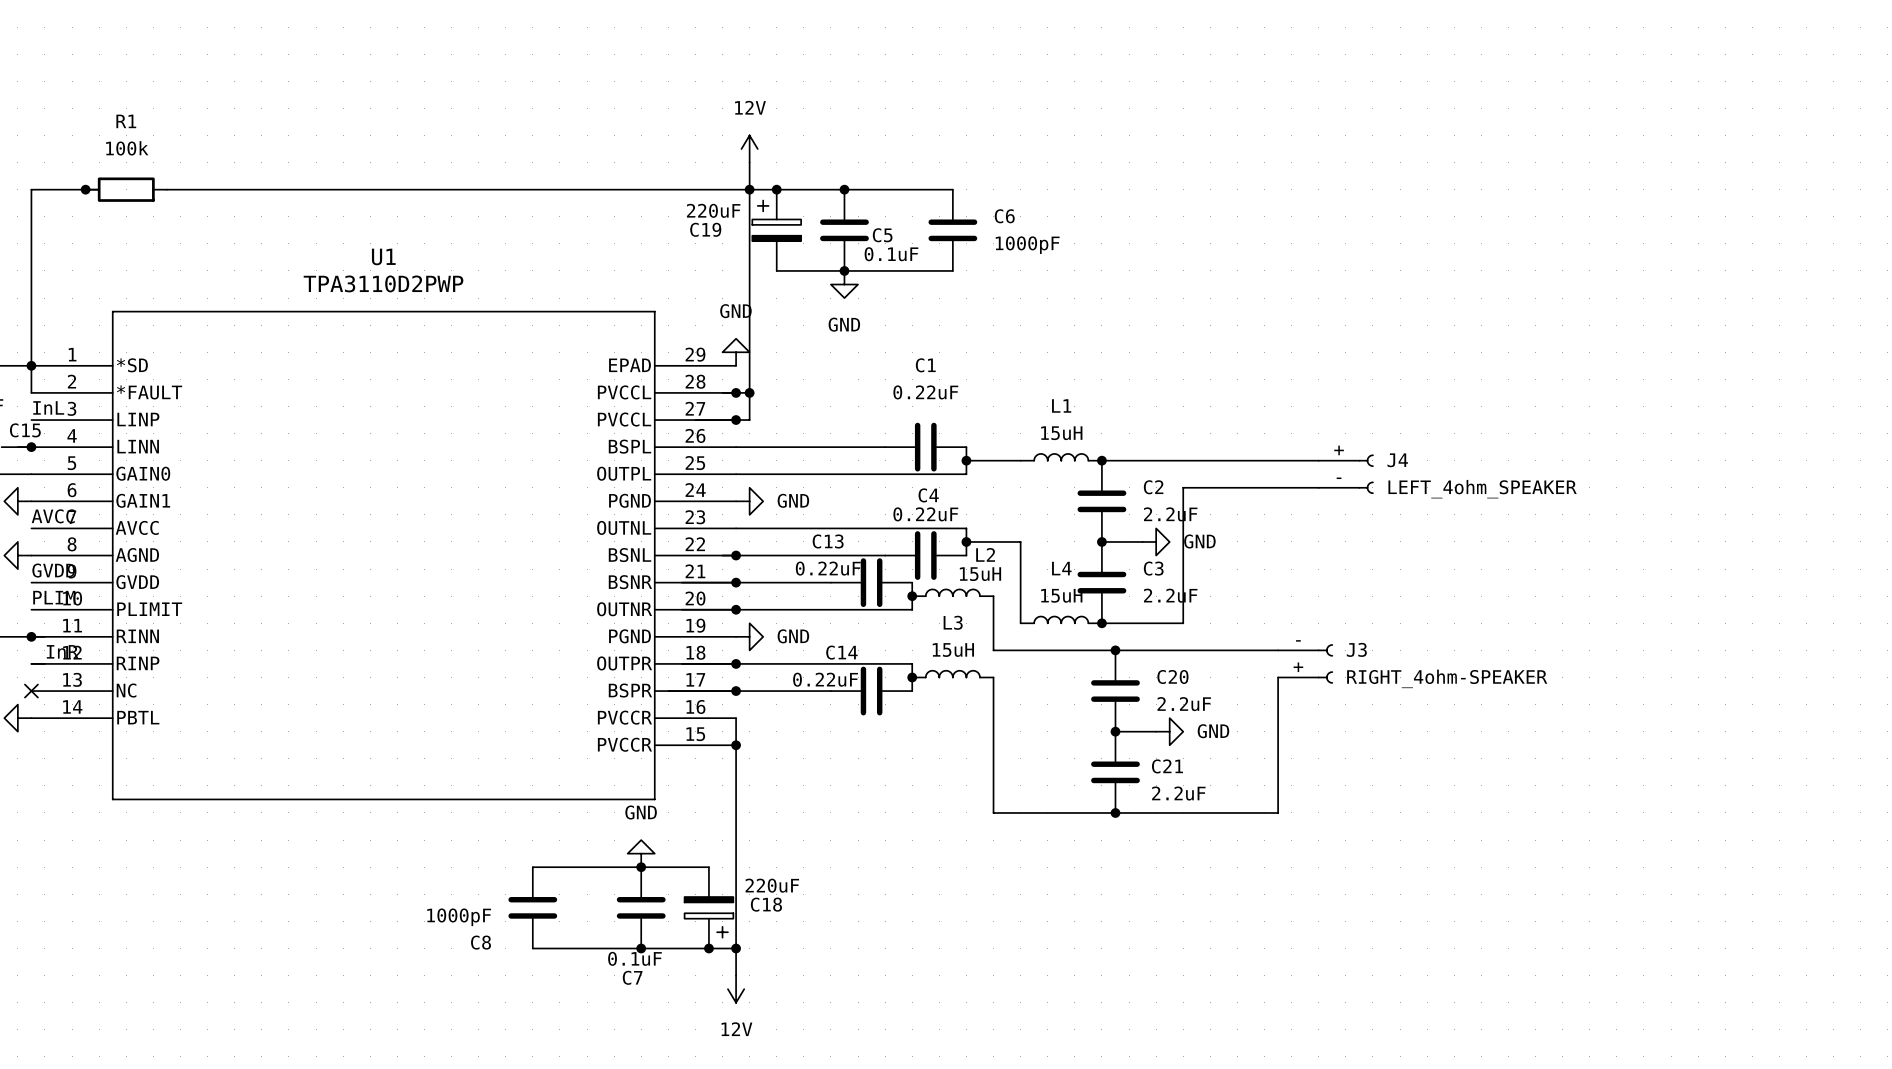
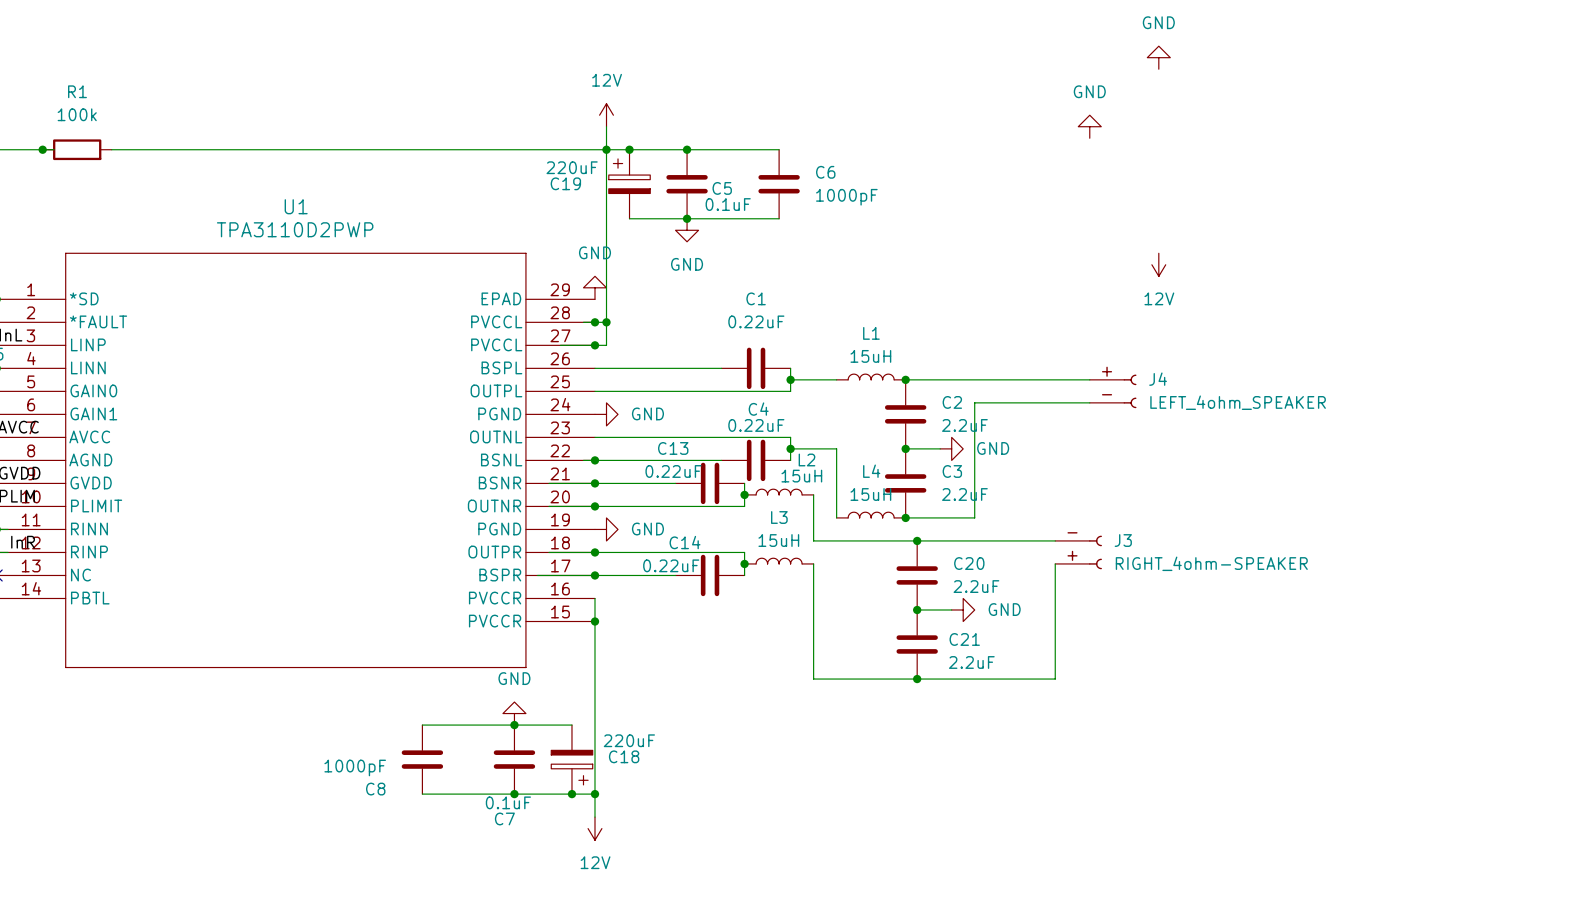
power symbol: none -> GND (1158, 57)
power symbol: none -> GND (1089, 126)
power symbol: none -> 12V (1158, 264)

